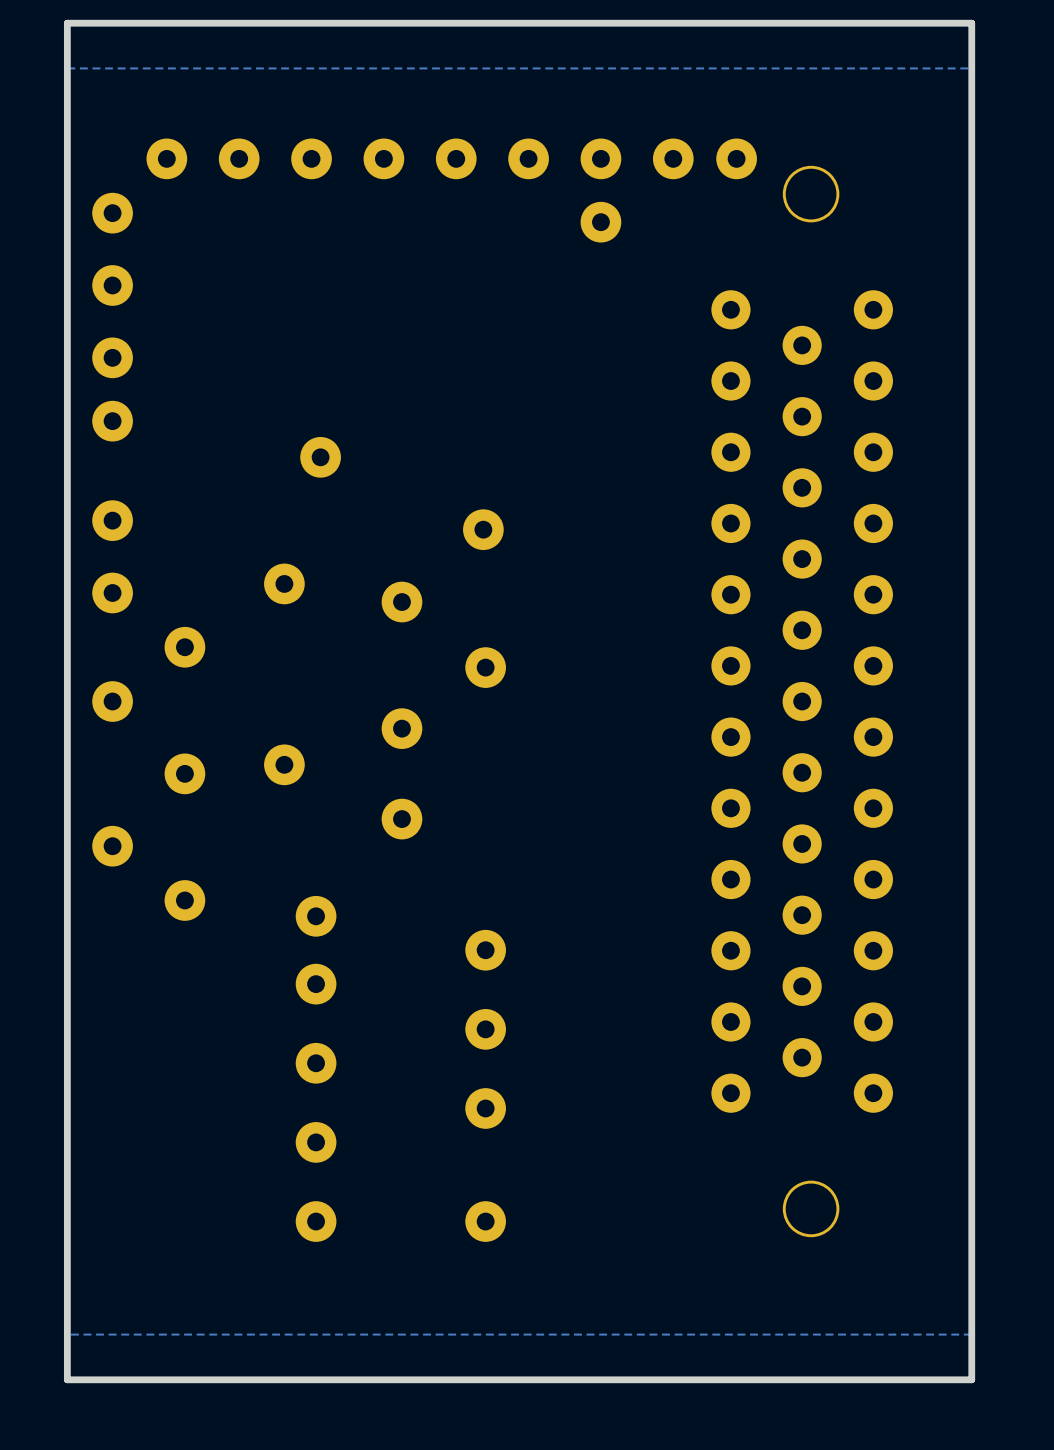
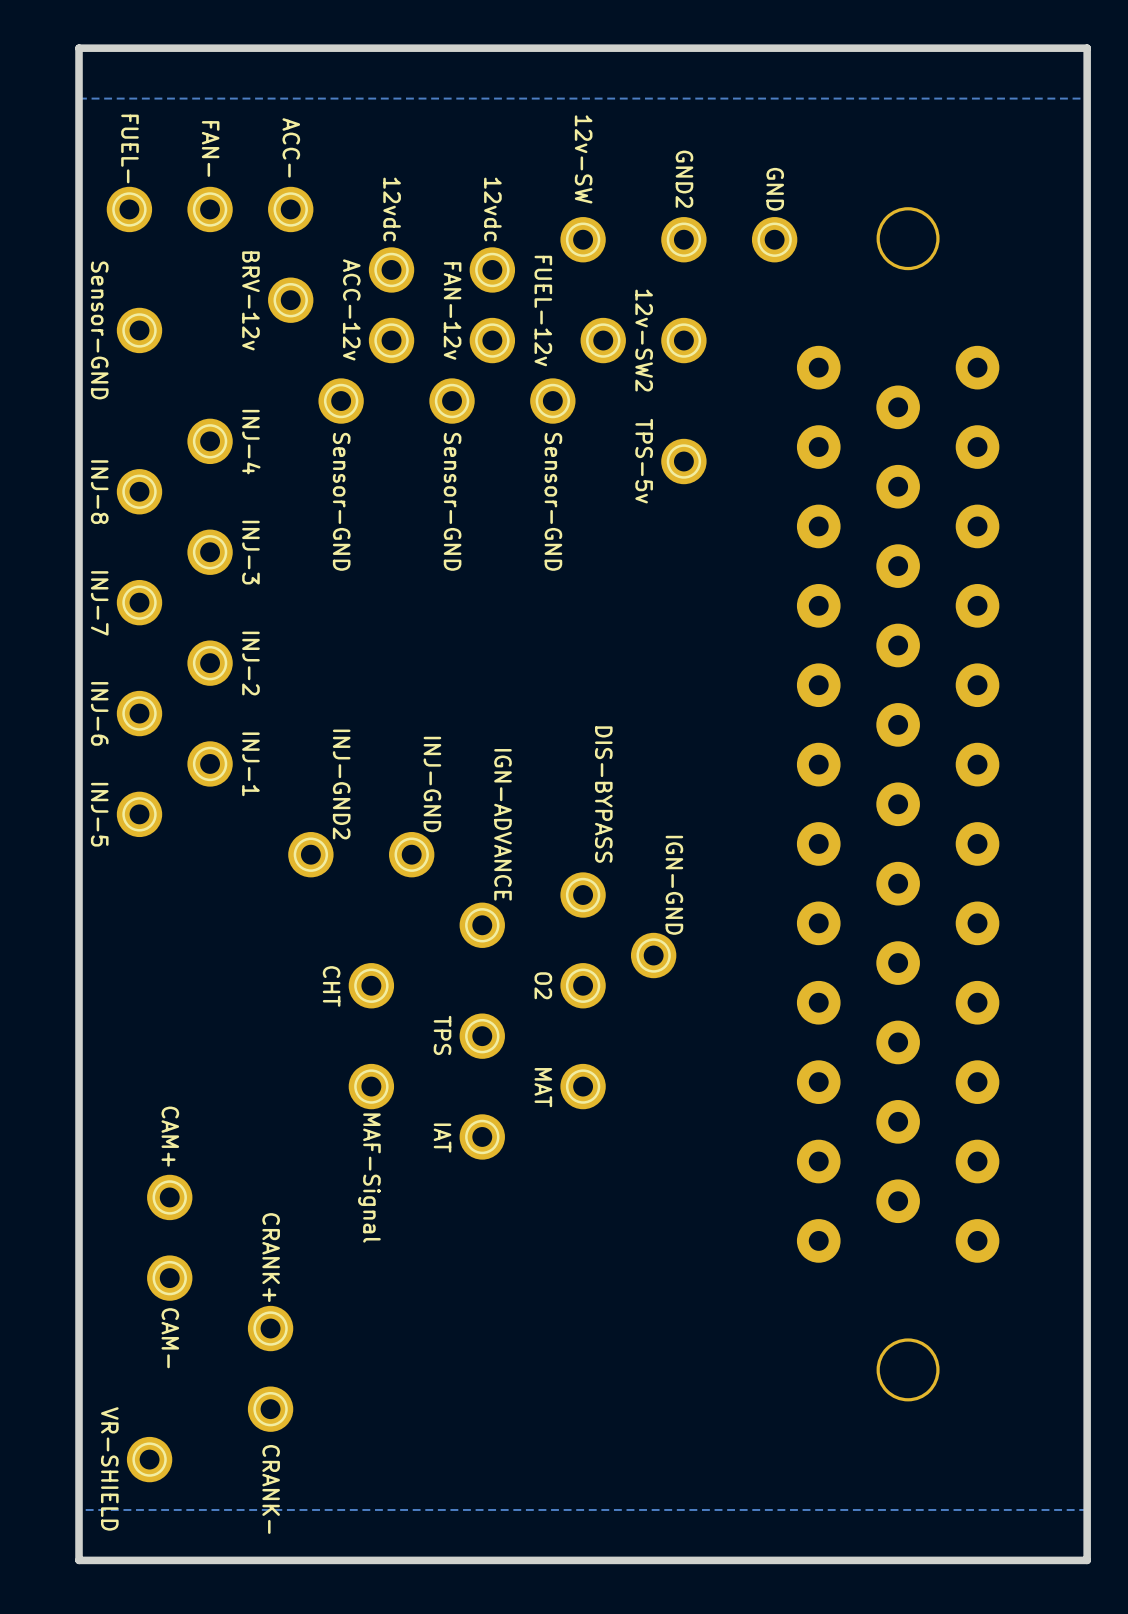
part side: top (166, 158) -> bottom (492, 269)
part side: top (239, 158) -> bottom (391, 269)
part side: top (311, 158) -> bottom (290, 300)
part side: top (383, 158) -> bottom (391, 340)
part side: top (456, 158) -> bottom (492, 340)
part side: top (528, 158) -> bottom (603, 340)
part side: top (600, 158) -> bottom (683, 340)
part side: top (673, 158) -> bottom (583, 239)
part: (736, 158) -> none
part: none -> FUEL- (129, 209)
part: none -> FAN- (210, 209)
part: none -> ACC- (290, 209)
part: none -> GND2 (683, 239)
part: (112, 213) -> none
part side: top (600, 222) -> bottom (774, 239)
part side: top (112, 285) -> bottom (139, 330)
part: none -> Sensor-GND (341, 401)
part: none -> Sensor-GND (452, 401)
part: none -> Sensor-GND (552, 401)
part: (112, 357) -> none
part: none -> INJ-4 (210, 441)
part side: top (112, 421) -> bottom (139, 491)
part side: top (320, 457) -> bottom (683, 461)
part: none -> INJ-3 (210, 552)
part side: top (112, 520) -> bottom (139, 602)
part side: top (483, 529) -> bottom (482, 1036)
part: none -> INJ-2 (210, 663)
part: (284, 583) -> none
part: (112, 592) -> none
part side: top (401, 602) -> bottom (583, 985)
part: none -> INJ-6 (139, 713)
part: (184, 647) -> none
part side: top (485, 667) -> bottom (482, 1136)
part side: top (112, 701) -> bottom (139, 814)
part side: top (401, 728) -> bottom (583, 1086)
part: none -> INJ-GND2 (310, 854)
part: none -> INJ-GND (411, 854)
part: (284, 764) -> none
part side: top (184, 773) -> bottom (482, 925)
part side: top (401, 819) -> bottom (371, 985)
part: none -> IGN-GND (653, 955)
part side: top (112, 846) -> bottom (583, 895)
part side: top (184, 900) -> bottom (371, 1086)
part: (316, 916) -> none
part side: top (485, 950) -> bottom (210, 763)
part: (316, 984) -> none
part: (485, 1029) -> none
part: none -> CAM+ (169, 1197)
part: (316, 1063) -> none
part: (485, 1108) -> none
part: none -> CAM- (169, 1278)
part: (316, 1142) -> none
part: none -> CRANK+ (270, 1328)
part: (316, 1221) -> none
part: (485, 1221) -> none
part: none -> CRANK- (270, 1409)
part: none -> VR-SHIELD (149, 1459)

